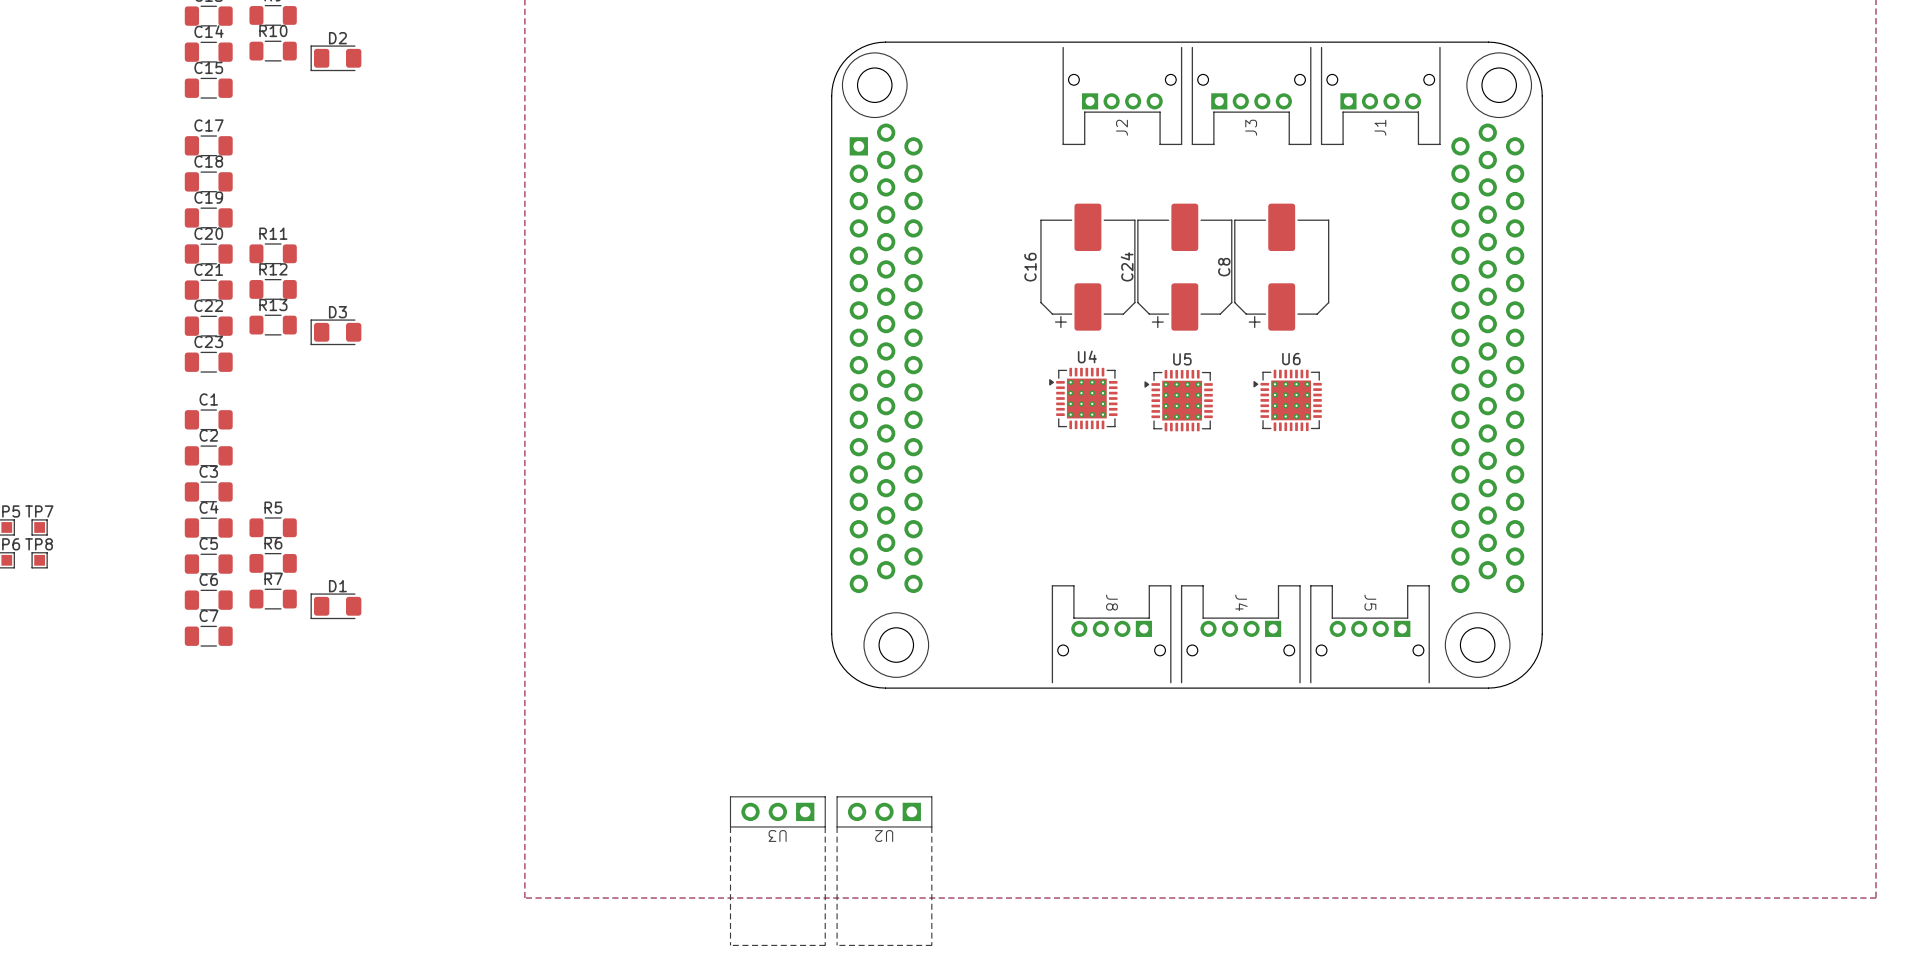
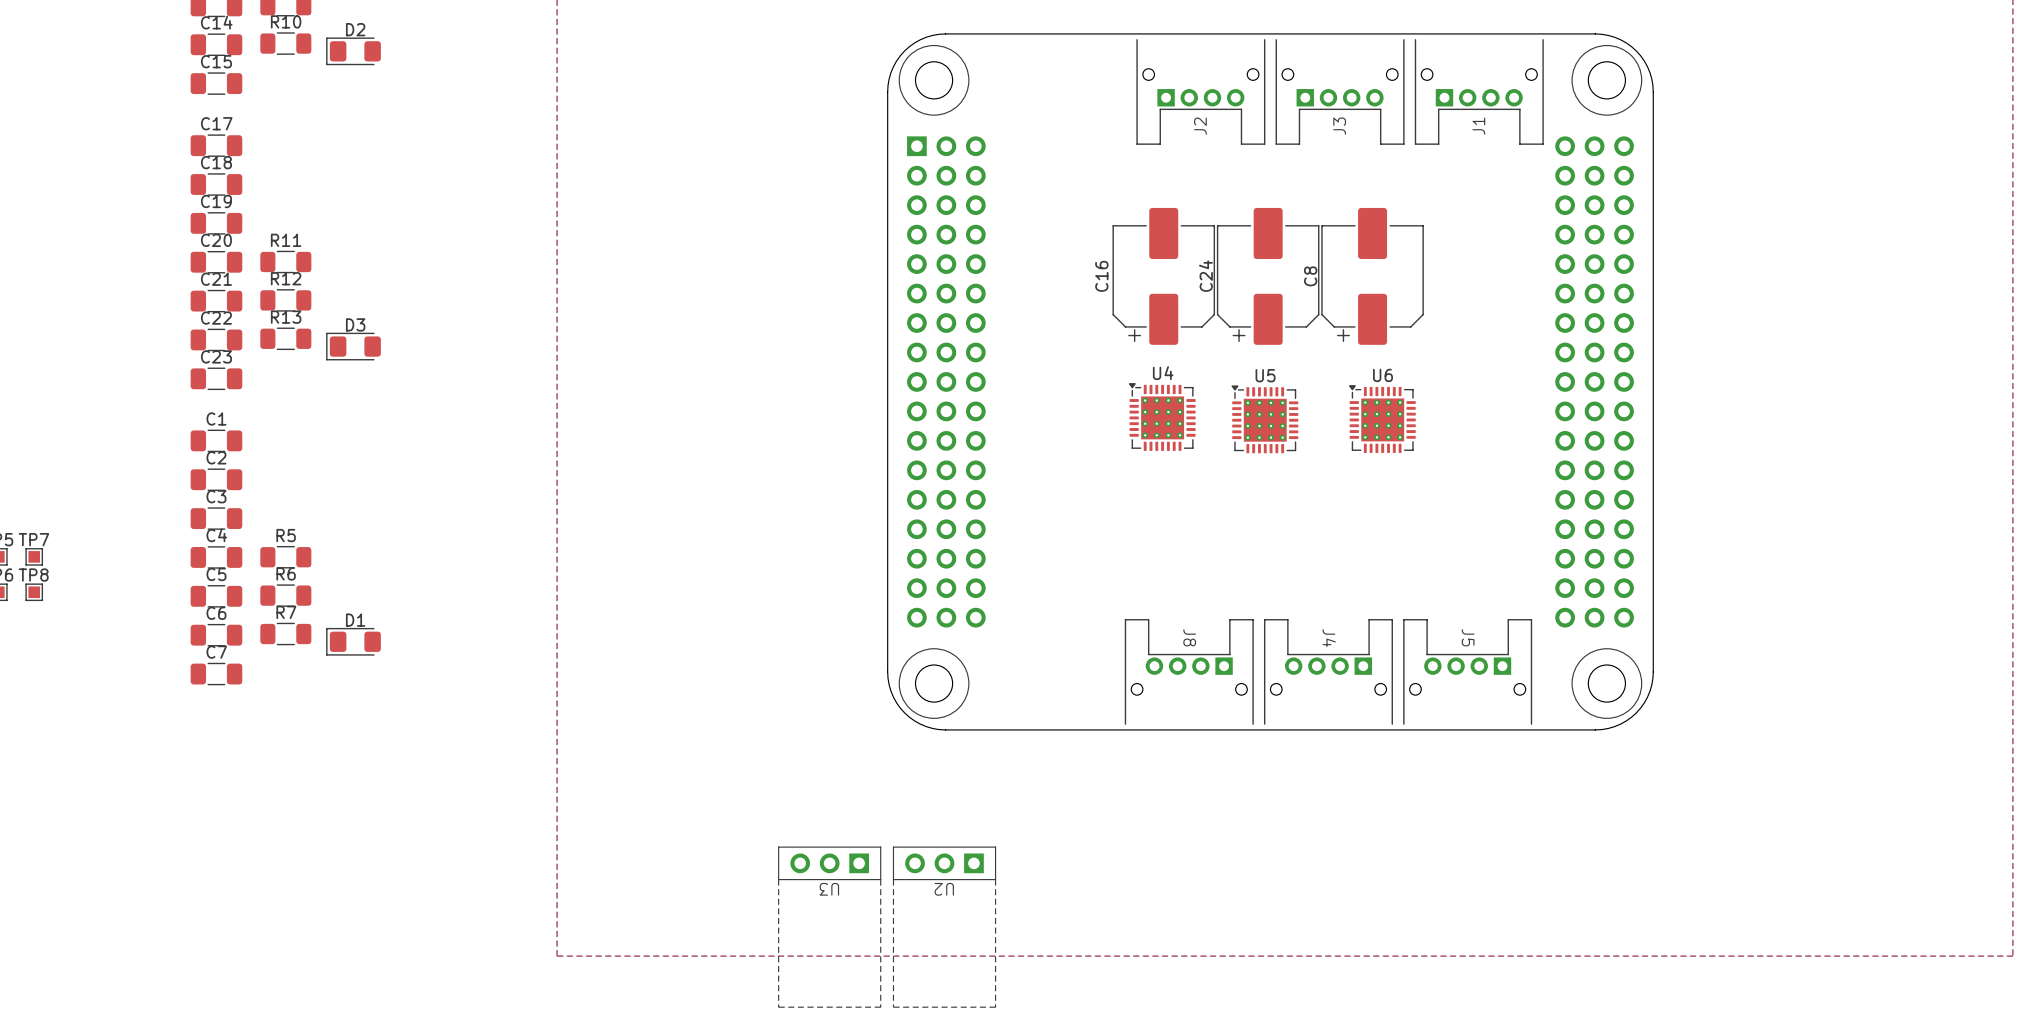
part footprint: [831, 41, 1543, 689] -> [887, 33, 1654, 731]
U4 footprint: [1049, 367, 1118, 430] -> [1128, 383, 1196, 451]
U5 footprint: [1144, 369, 1213, 432] -> [1231, 385, 1299, 454]
U6 footprint: [1253, 369, 1322, 432] -> [1348, 385, 1416, 453]

